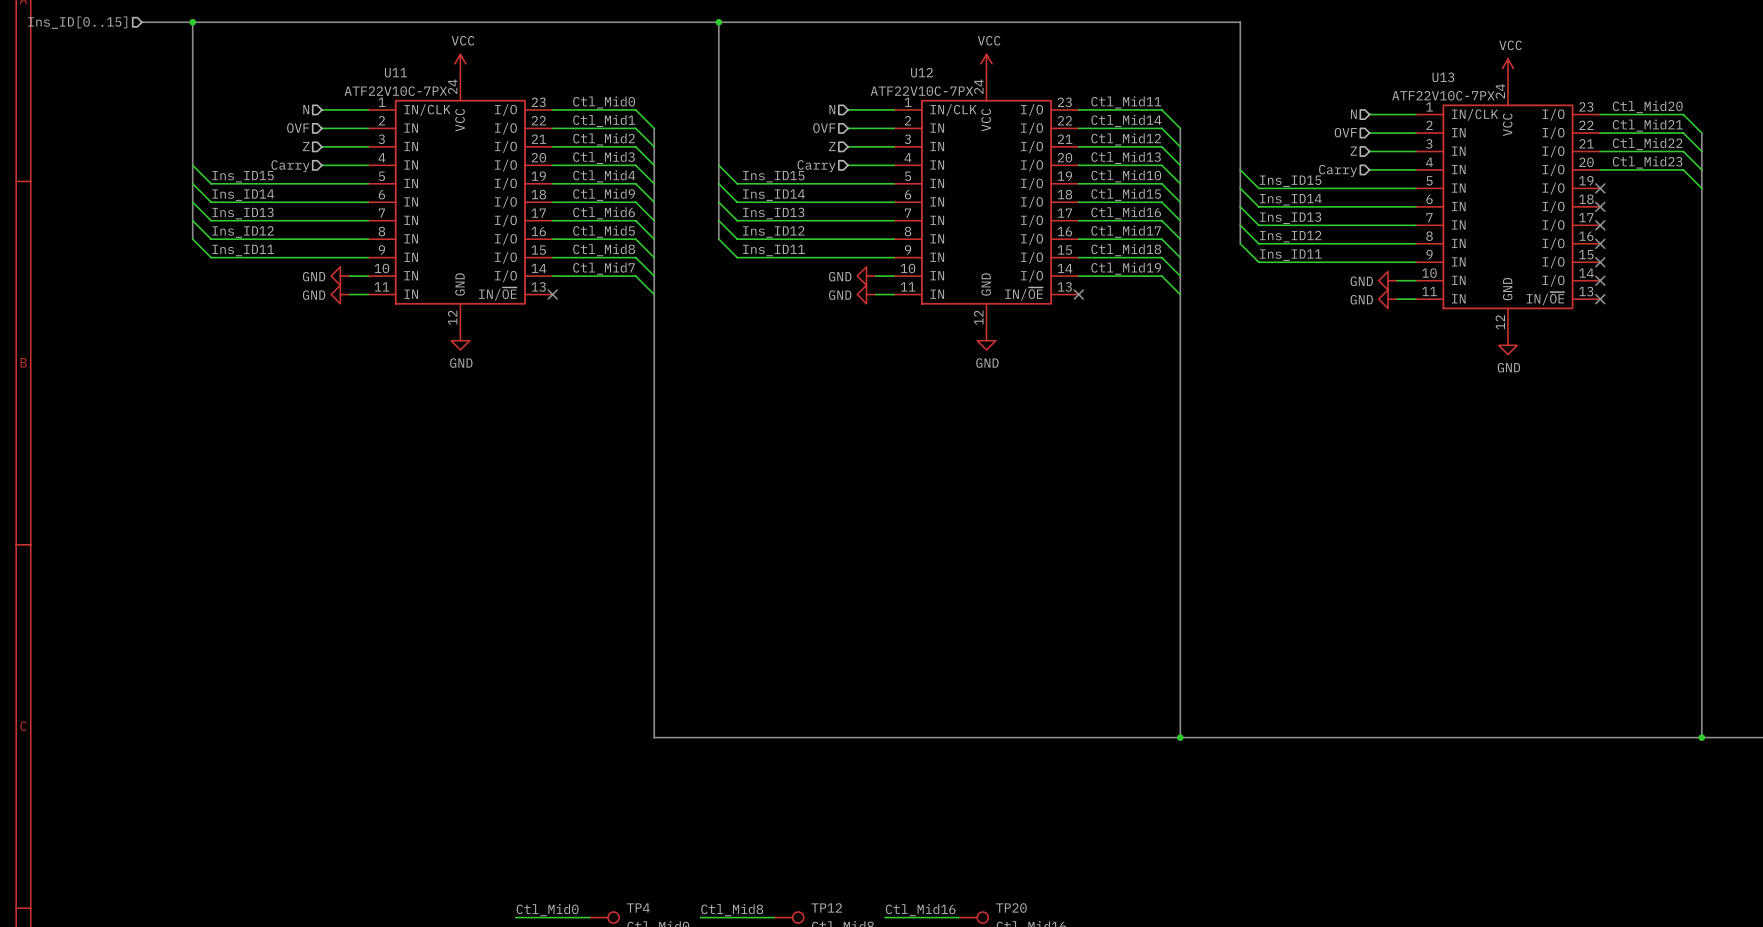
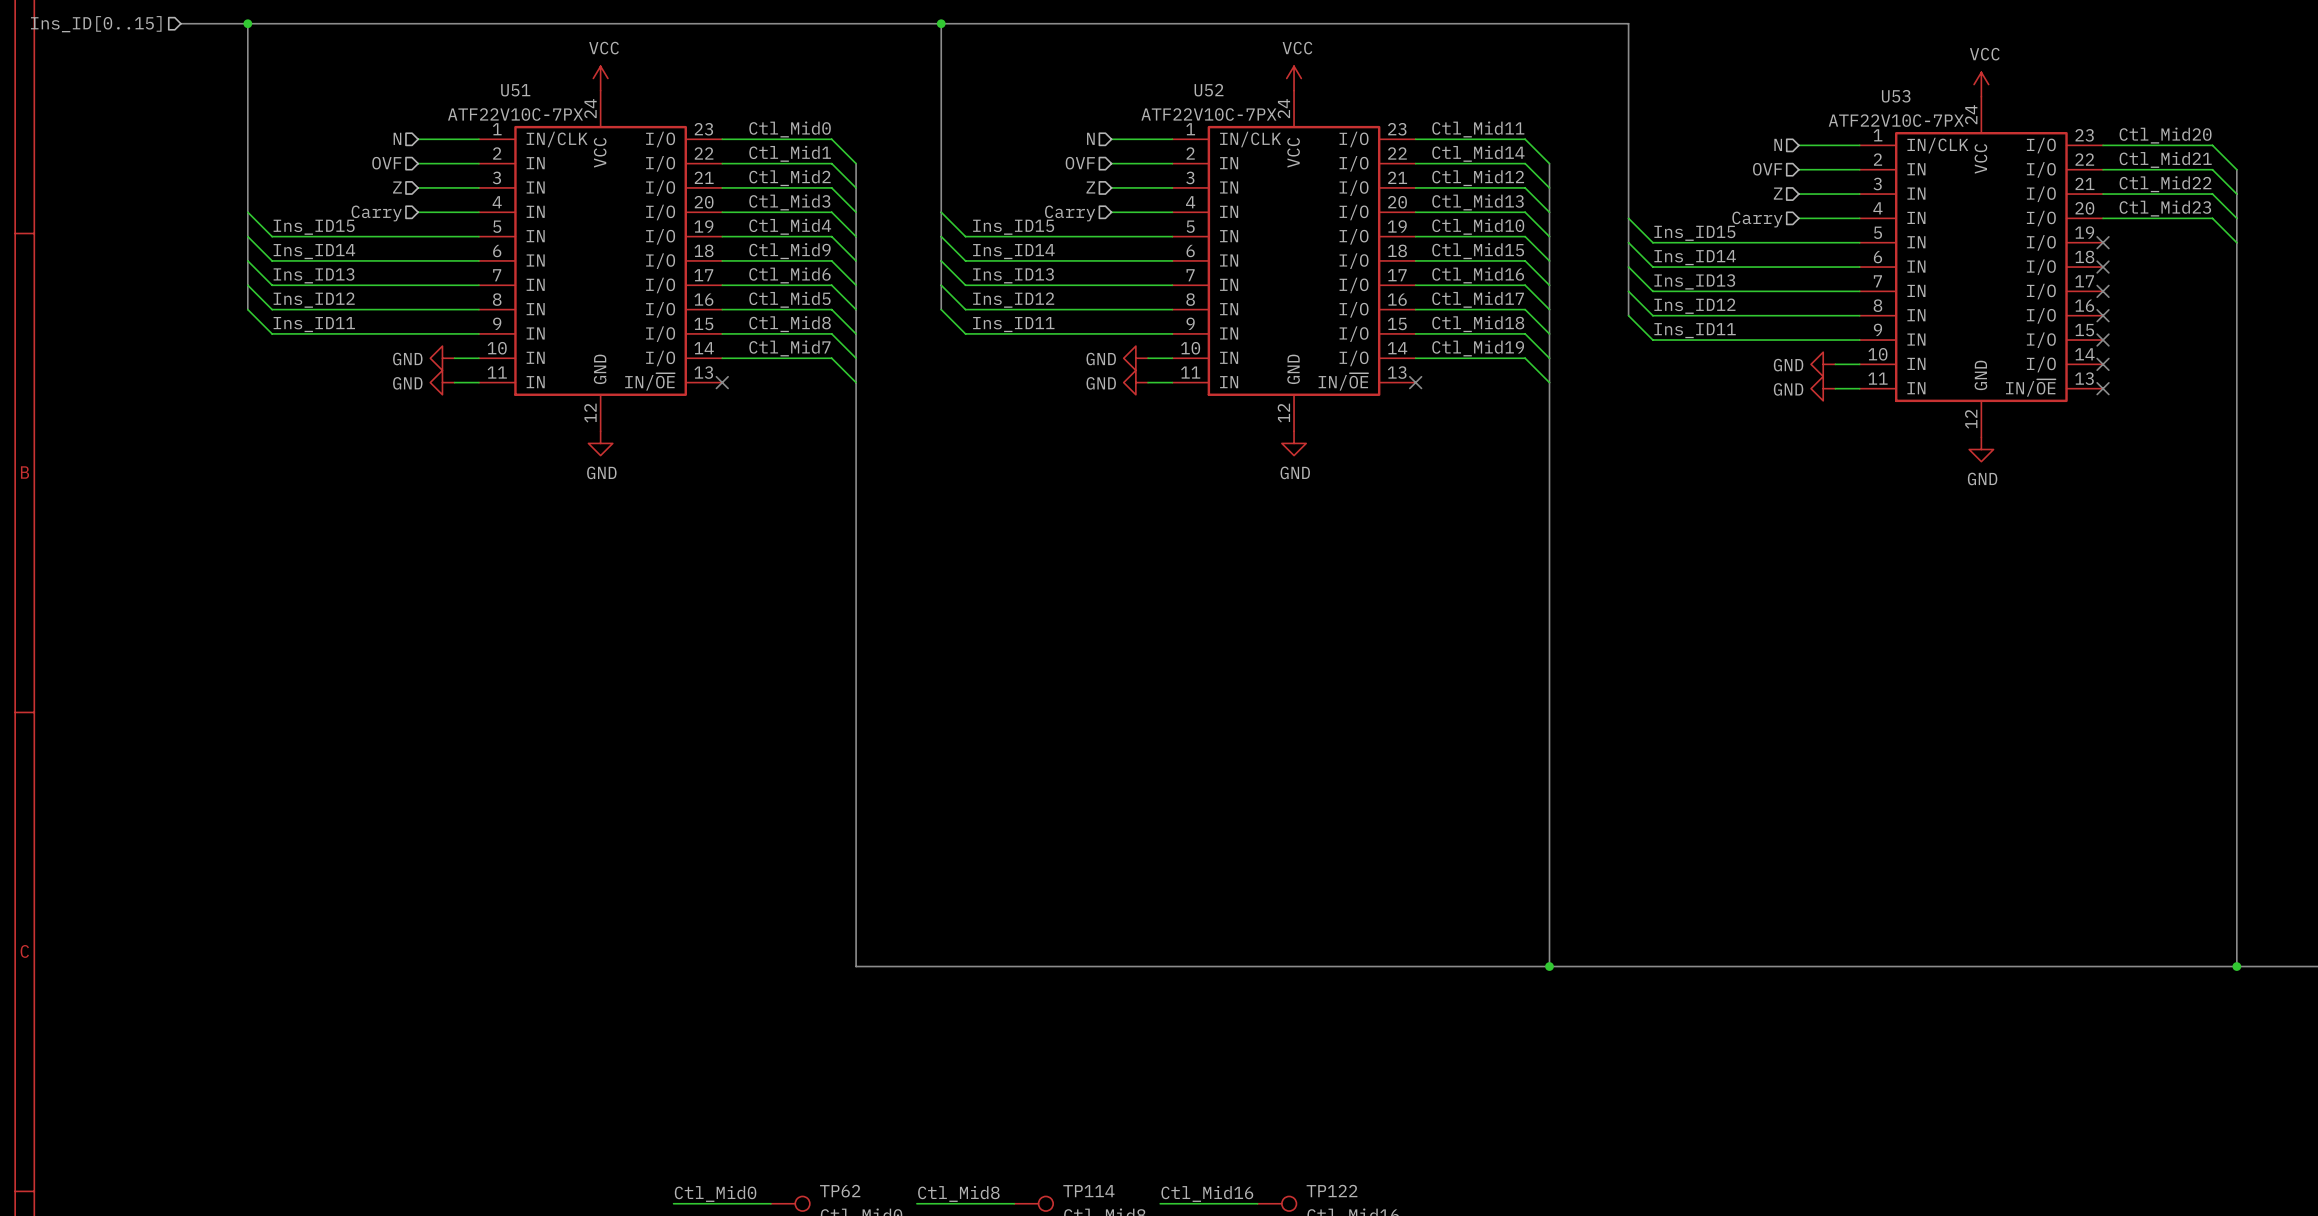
U11 name: U11 (395, 72) -> U51 (515, 90)
U12 name: U12 (922, 72) -> U52 (1209, 90)
U13 name: U13 (1443, 77) -> U53 (1896, 96)
TP12 name: TP12 (826, 907) -> TP114 (1088, 1191)
TP4 name: TP4 (638, 908) -> TP62 (840, 1191)
TP20 name: TP20 (1011, 908) -> TP122 (1332, 1191)

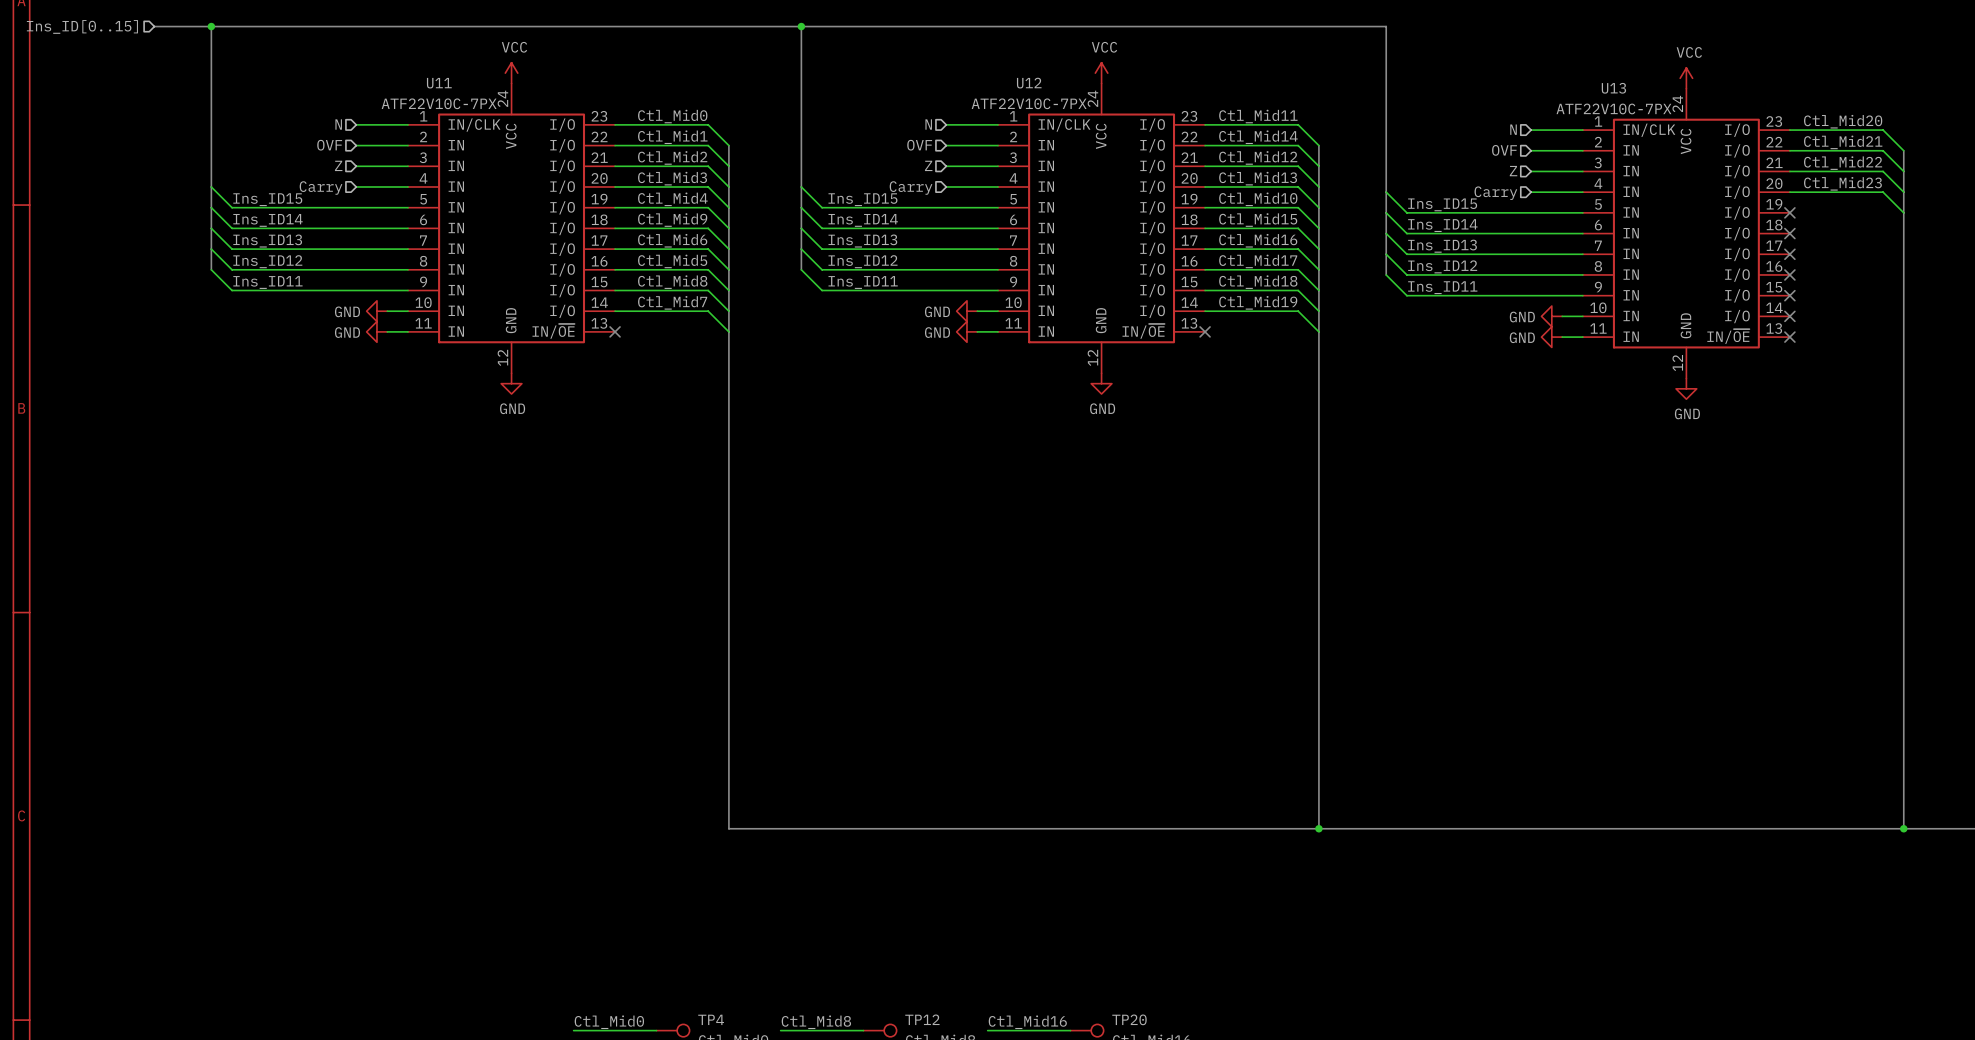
U51 name: U51 (515, 90) -> U11 (439, 83)
U52 name: U52 (1209, 90) -> U12 (1029, 83)
U53 name: U53 (1896, 96) -> U13 (1613, 88)
TP62 name: TP62 (840, 1191) -> TP4 (711, 1019)
TP114 name: TP114 (1088, 1191) -> TP12 (922, 1019)
TP122 name: TP122 (1332, 1191) -> TP20 (1129, 1019)

